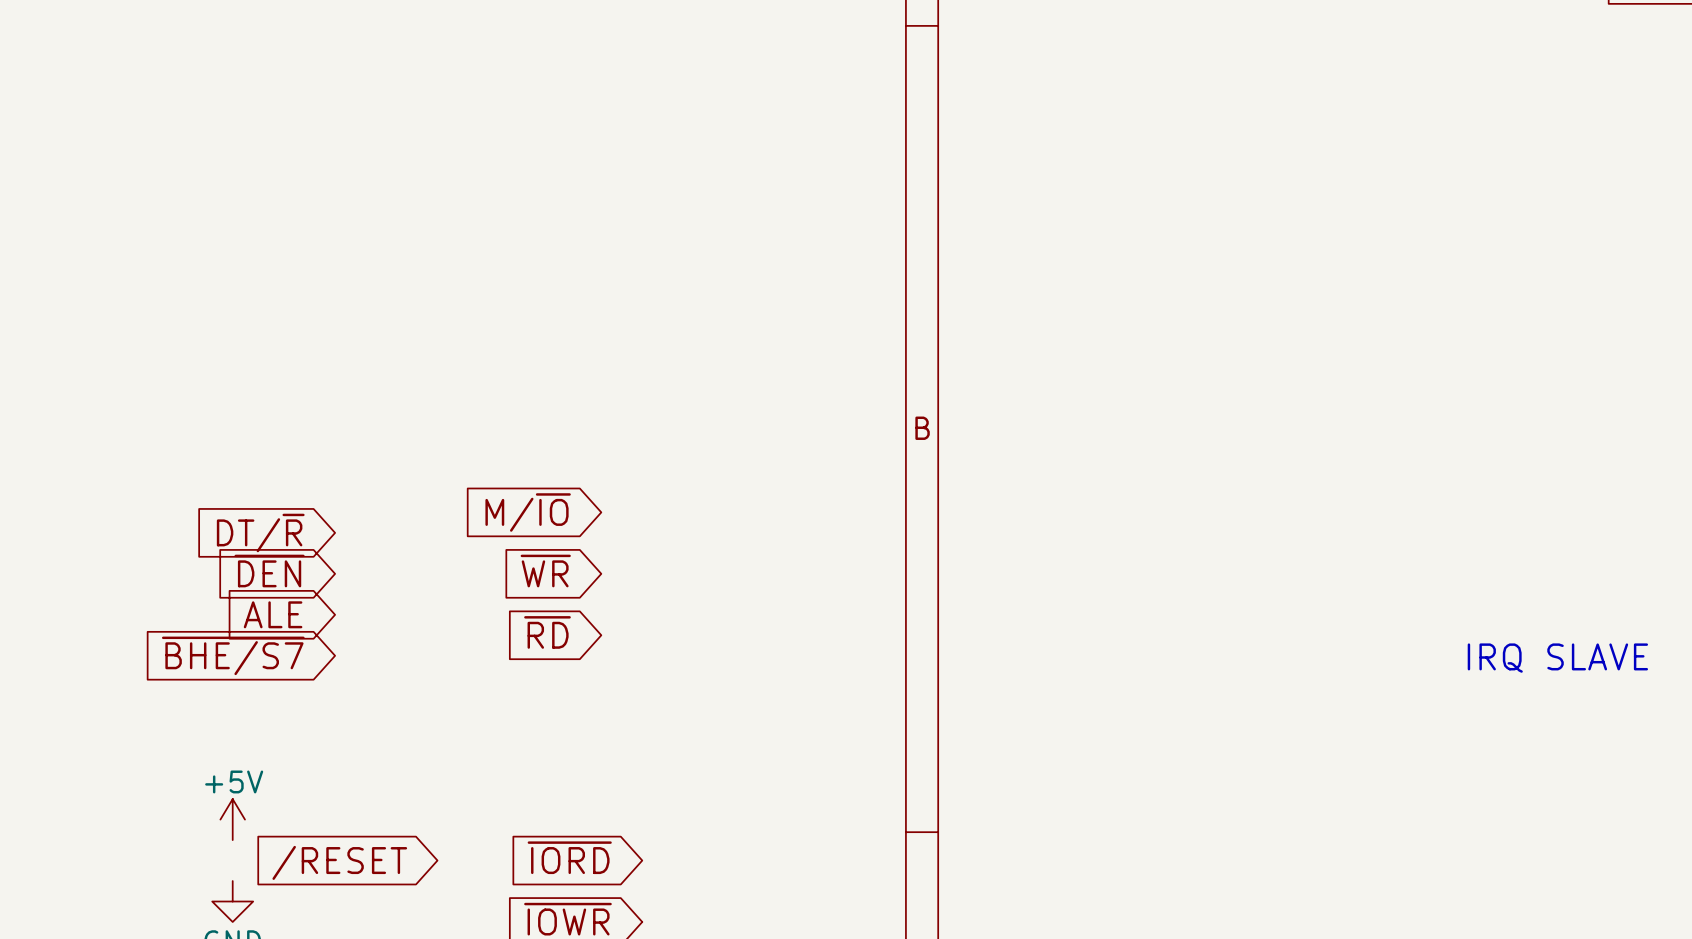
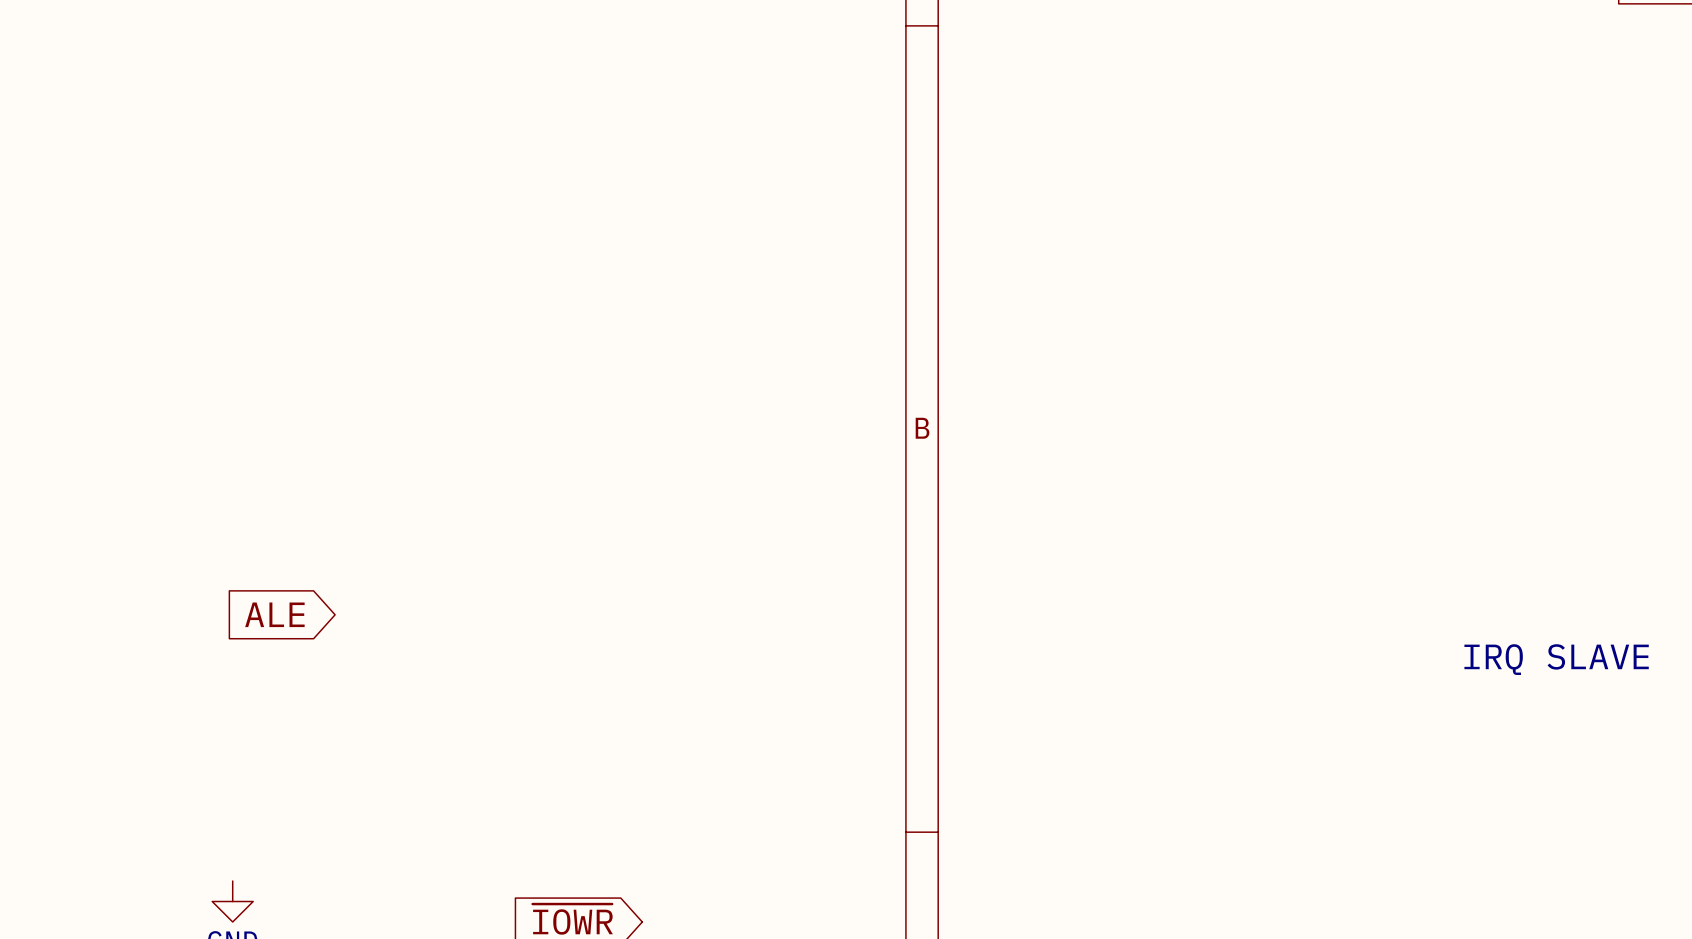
global label: M/~{IO} (528, 512) -> none
global label: DT/~{R} (260, 532) -> none
global label: ~{DEN} (269, 571) -> none
global label: ~{WR} (545, 571) -> none
global label: ~{RD} (547, 632) -> none
global label: ~{BHE/S7} (233, 655) -> none
power symbol: +5V (232, 819) -> none
global label: ~{IORD} (569, 857) -> none
global label: /RESET (339, 862) -> none

